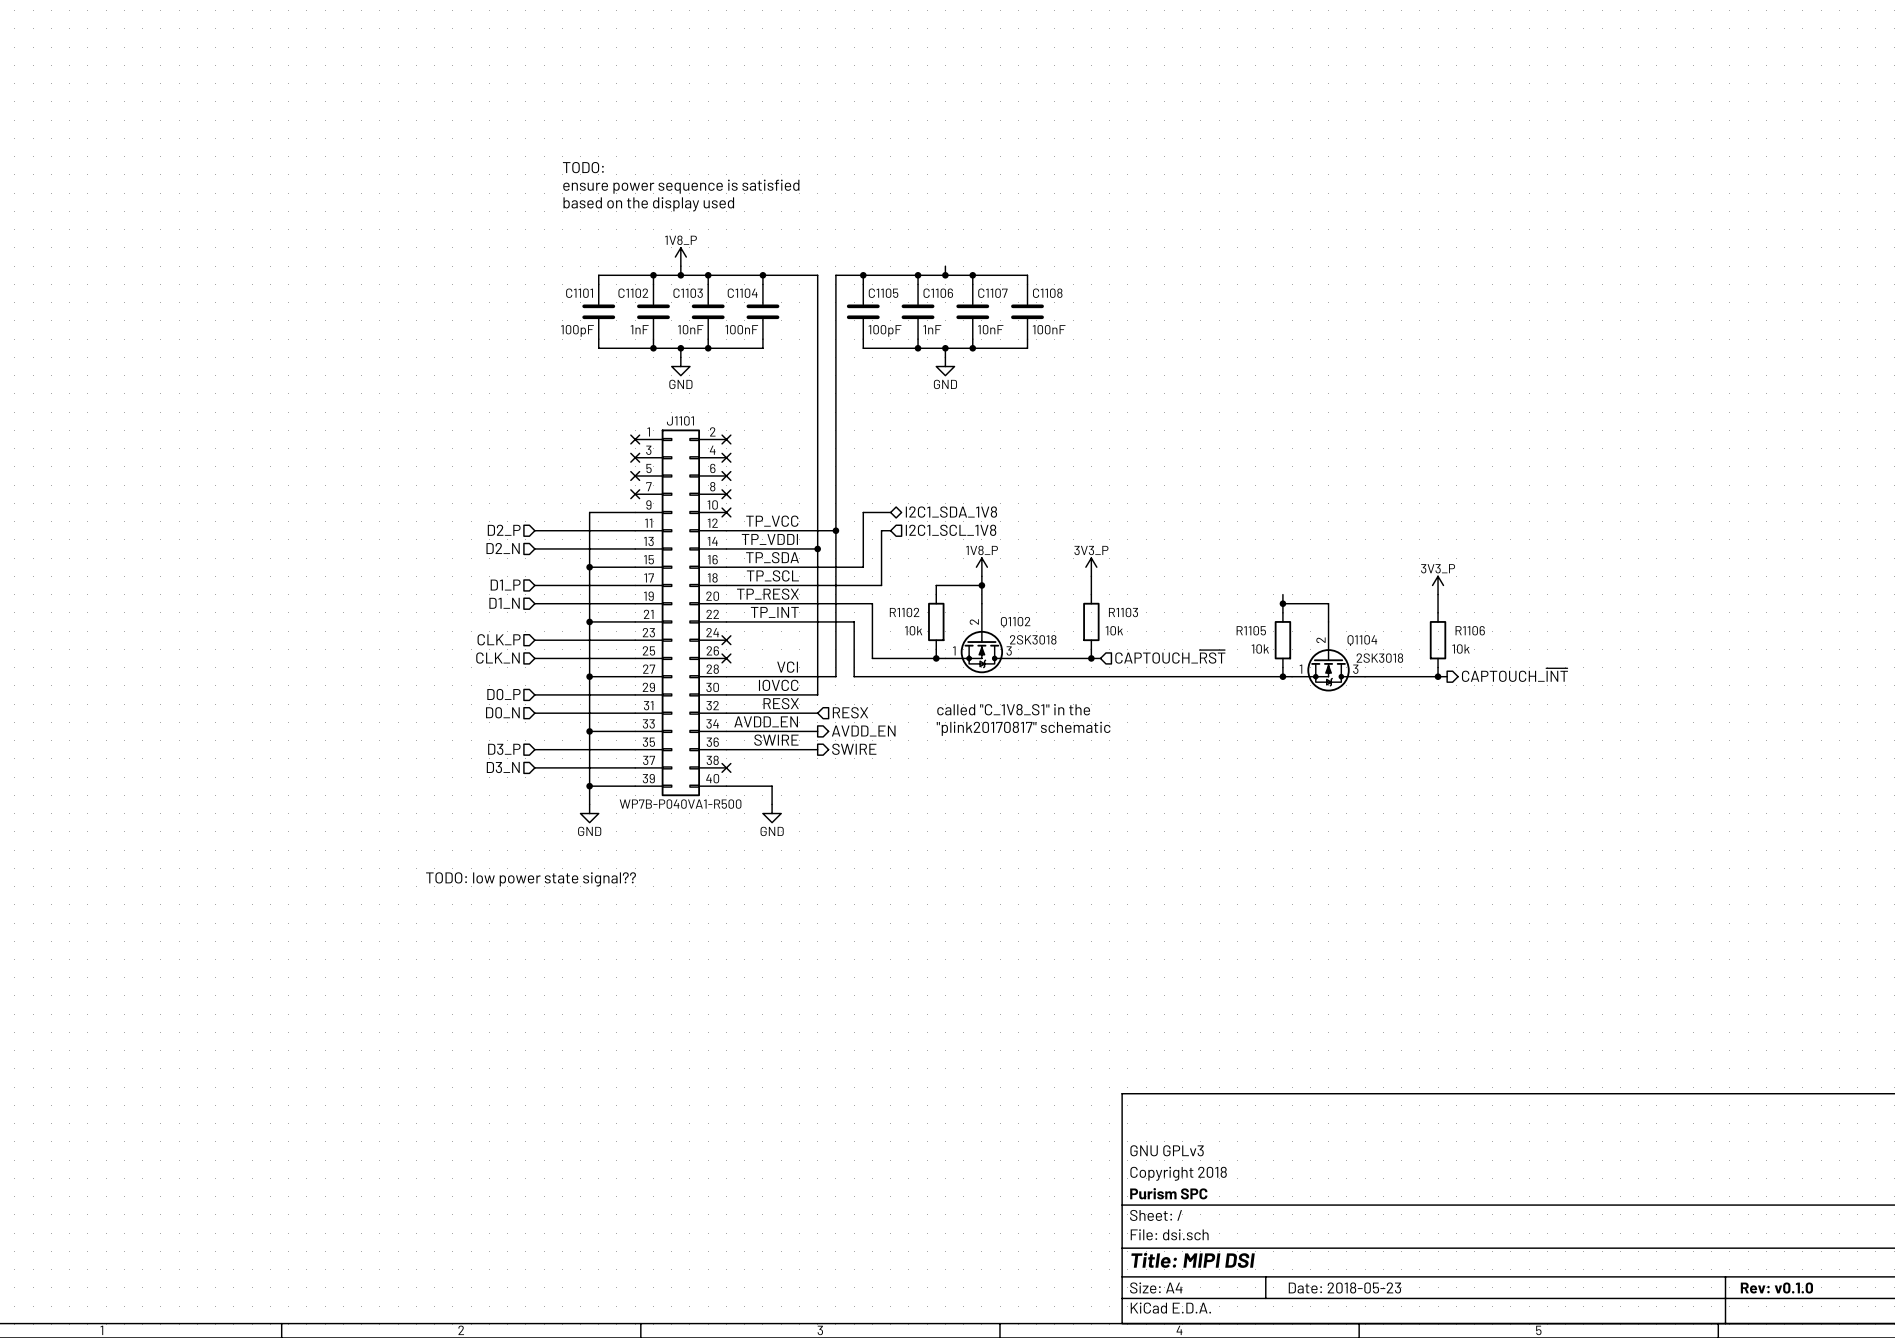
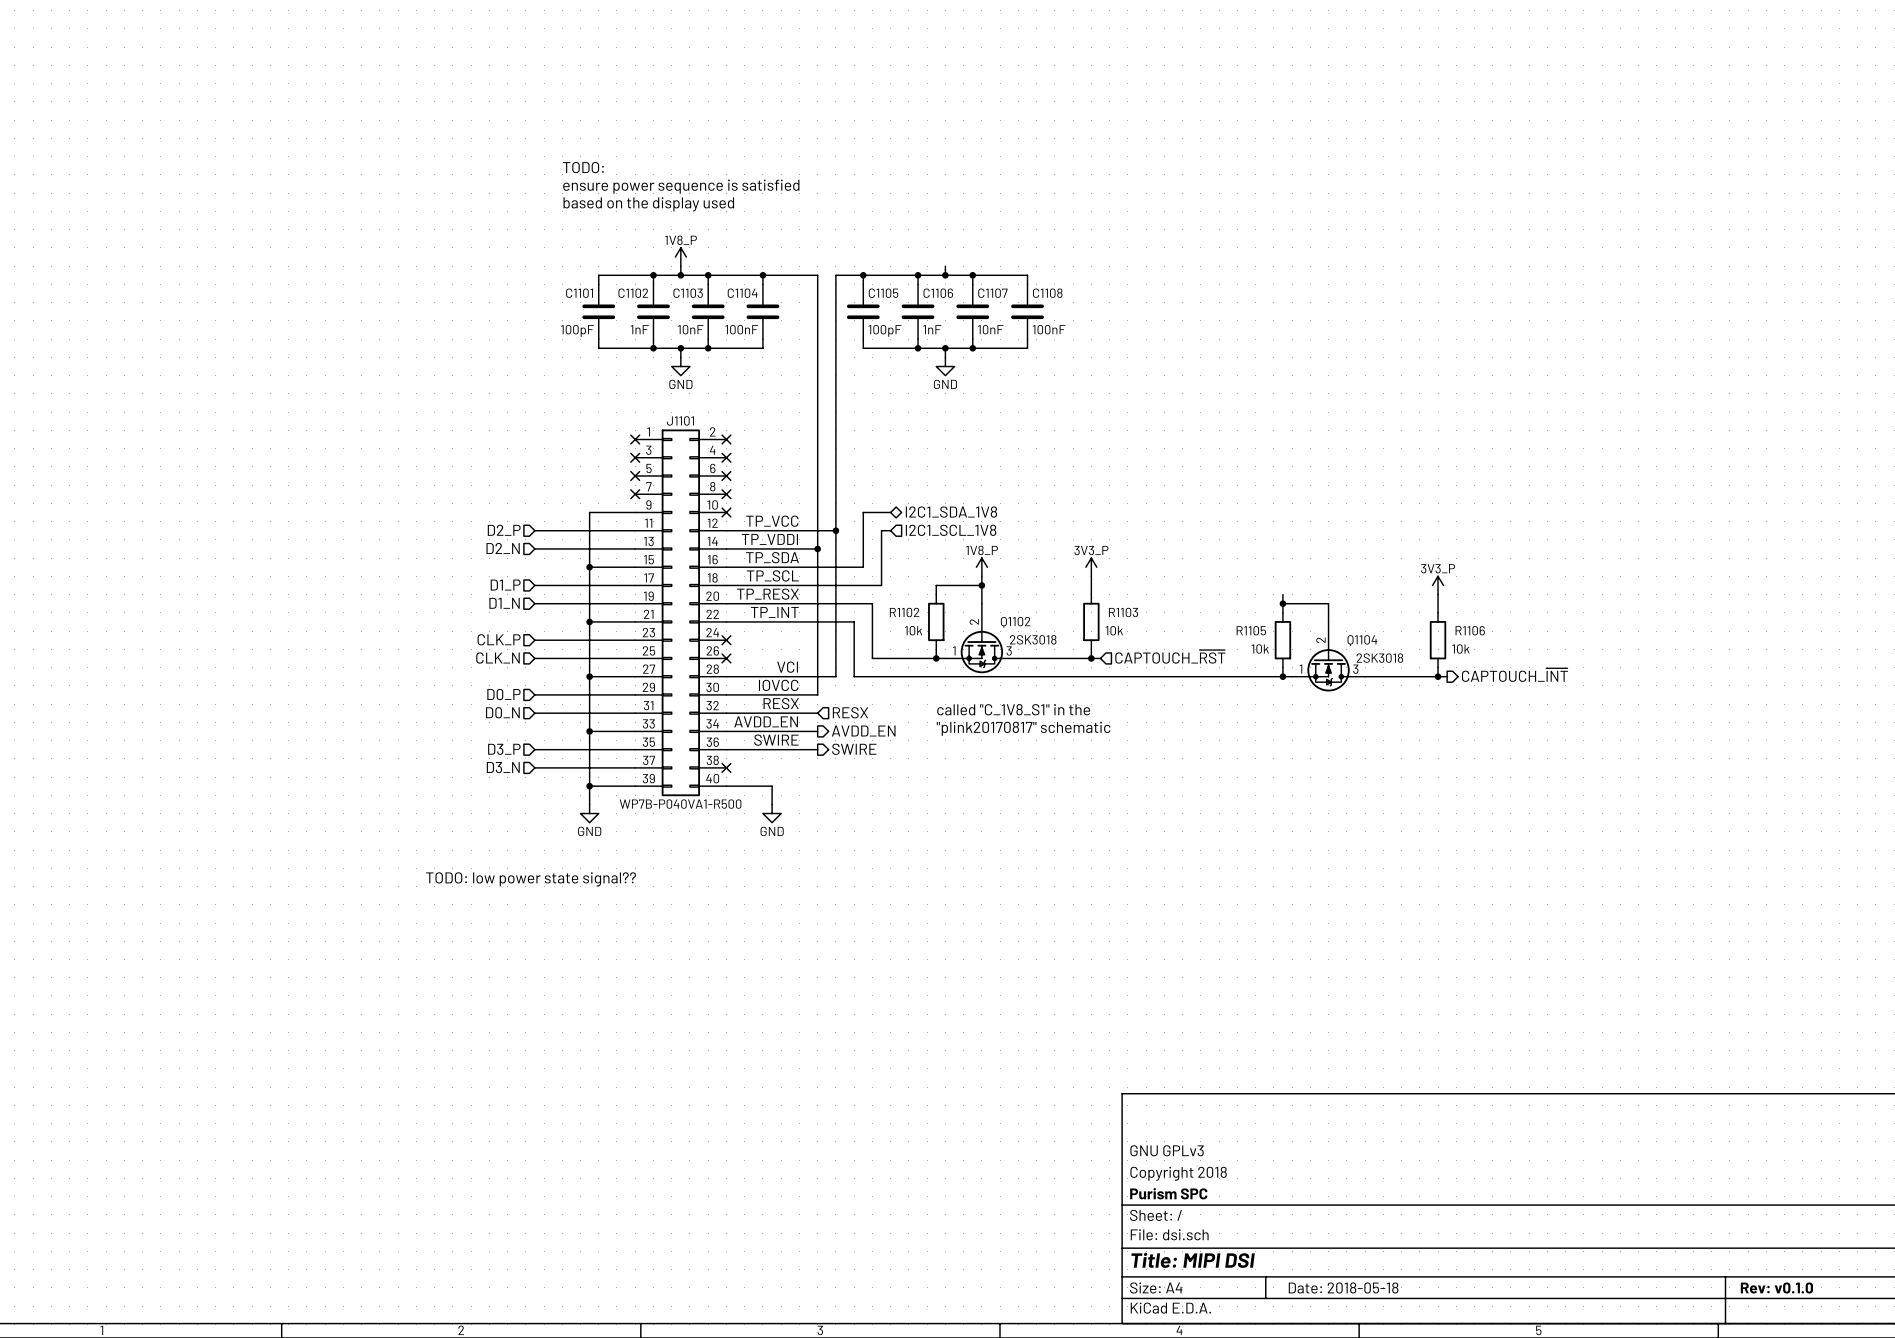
title block: Date: 2018-05-23 (1344, 1287) -> Date: 2018-05-18 (1343, 1287)

